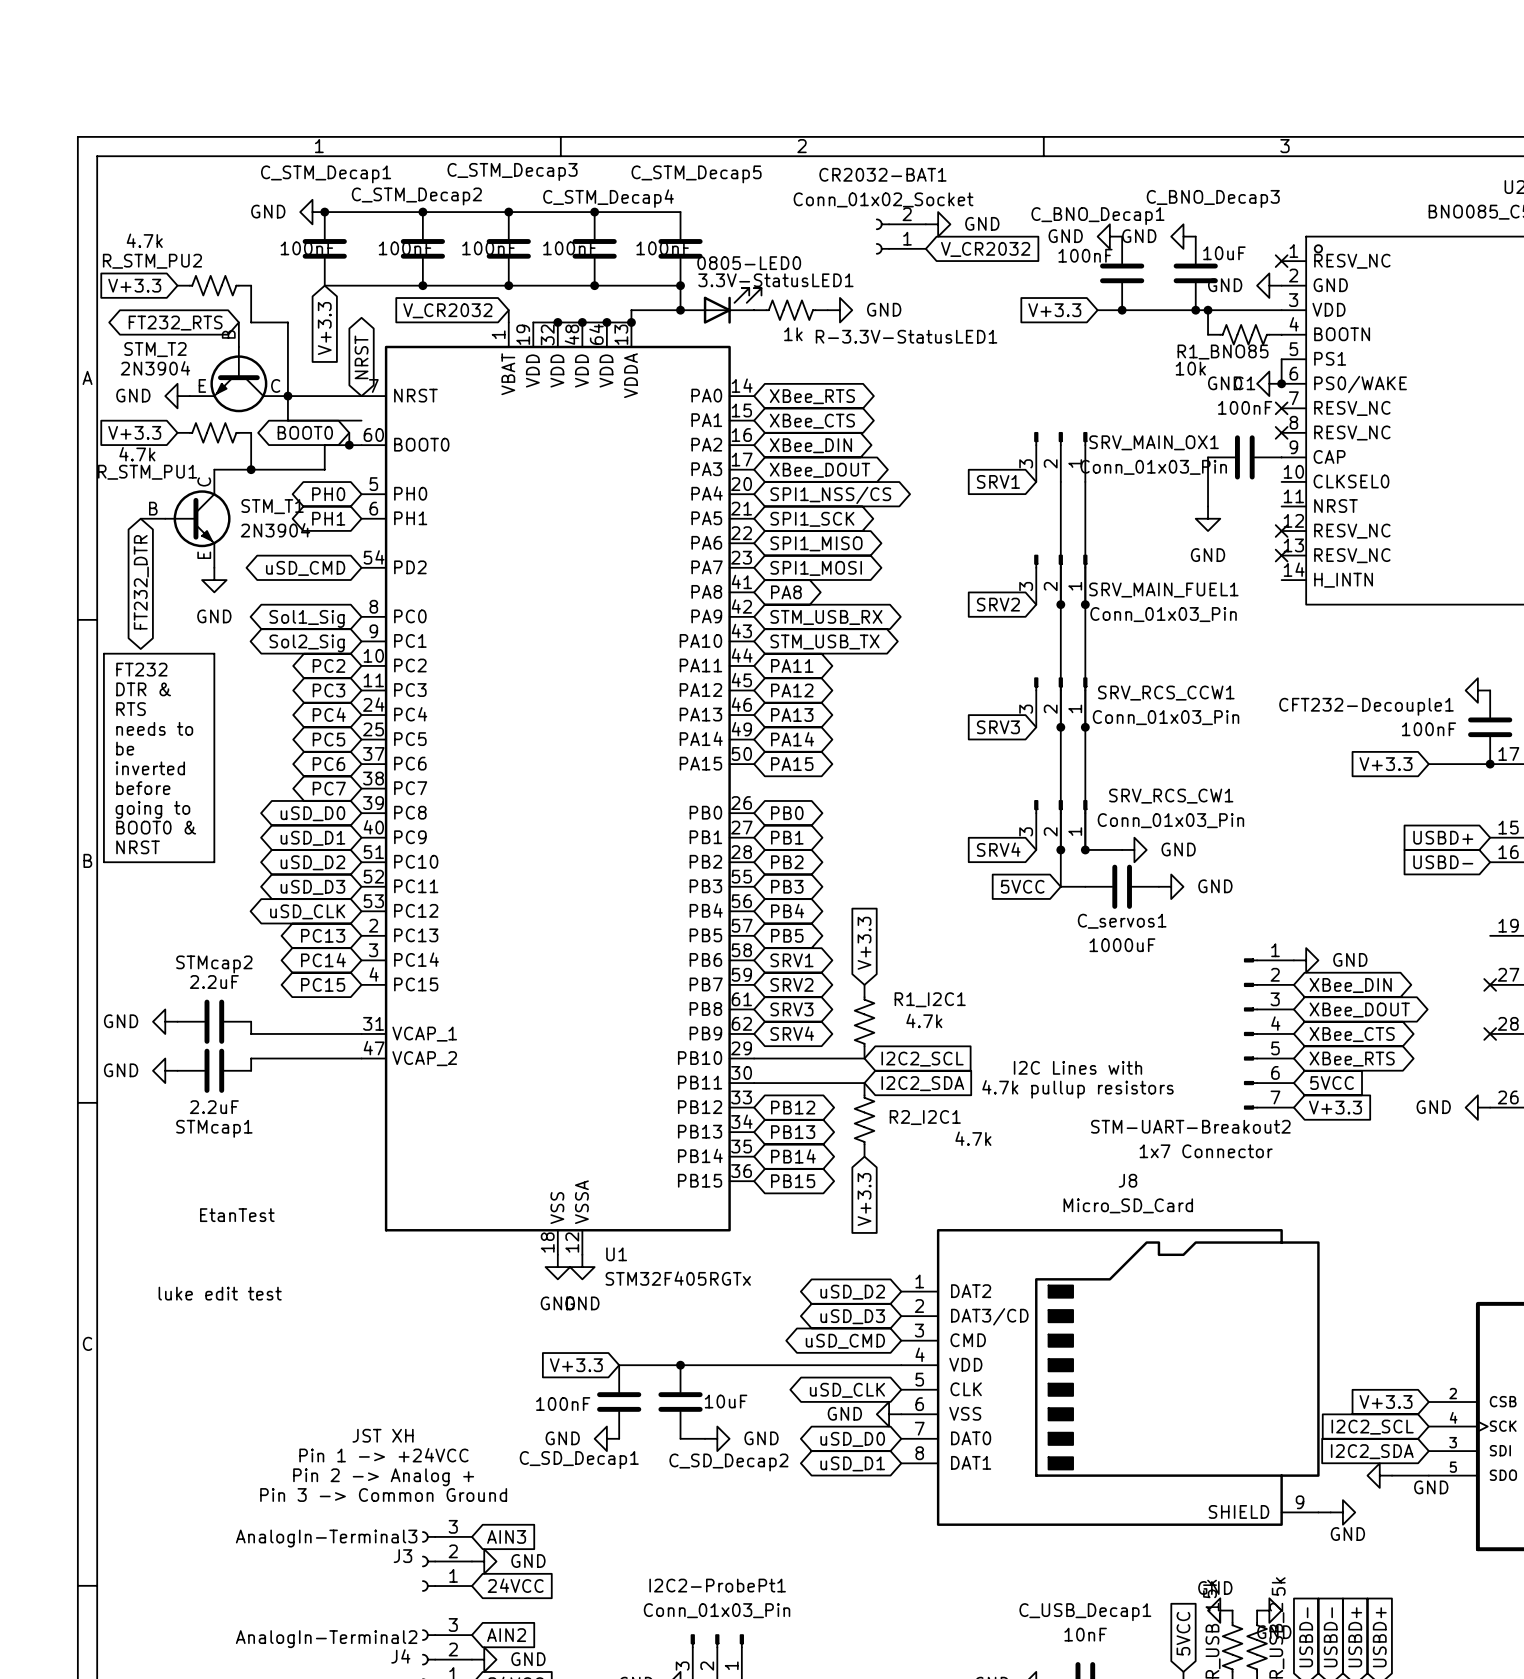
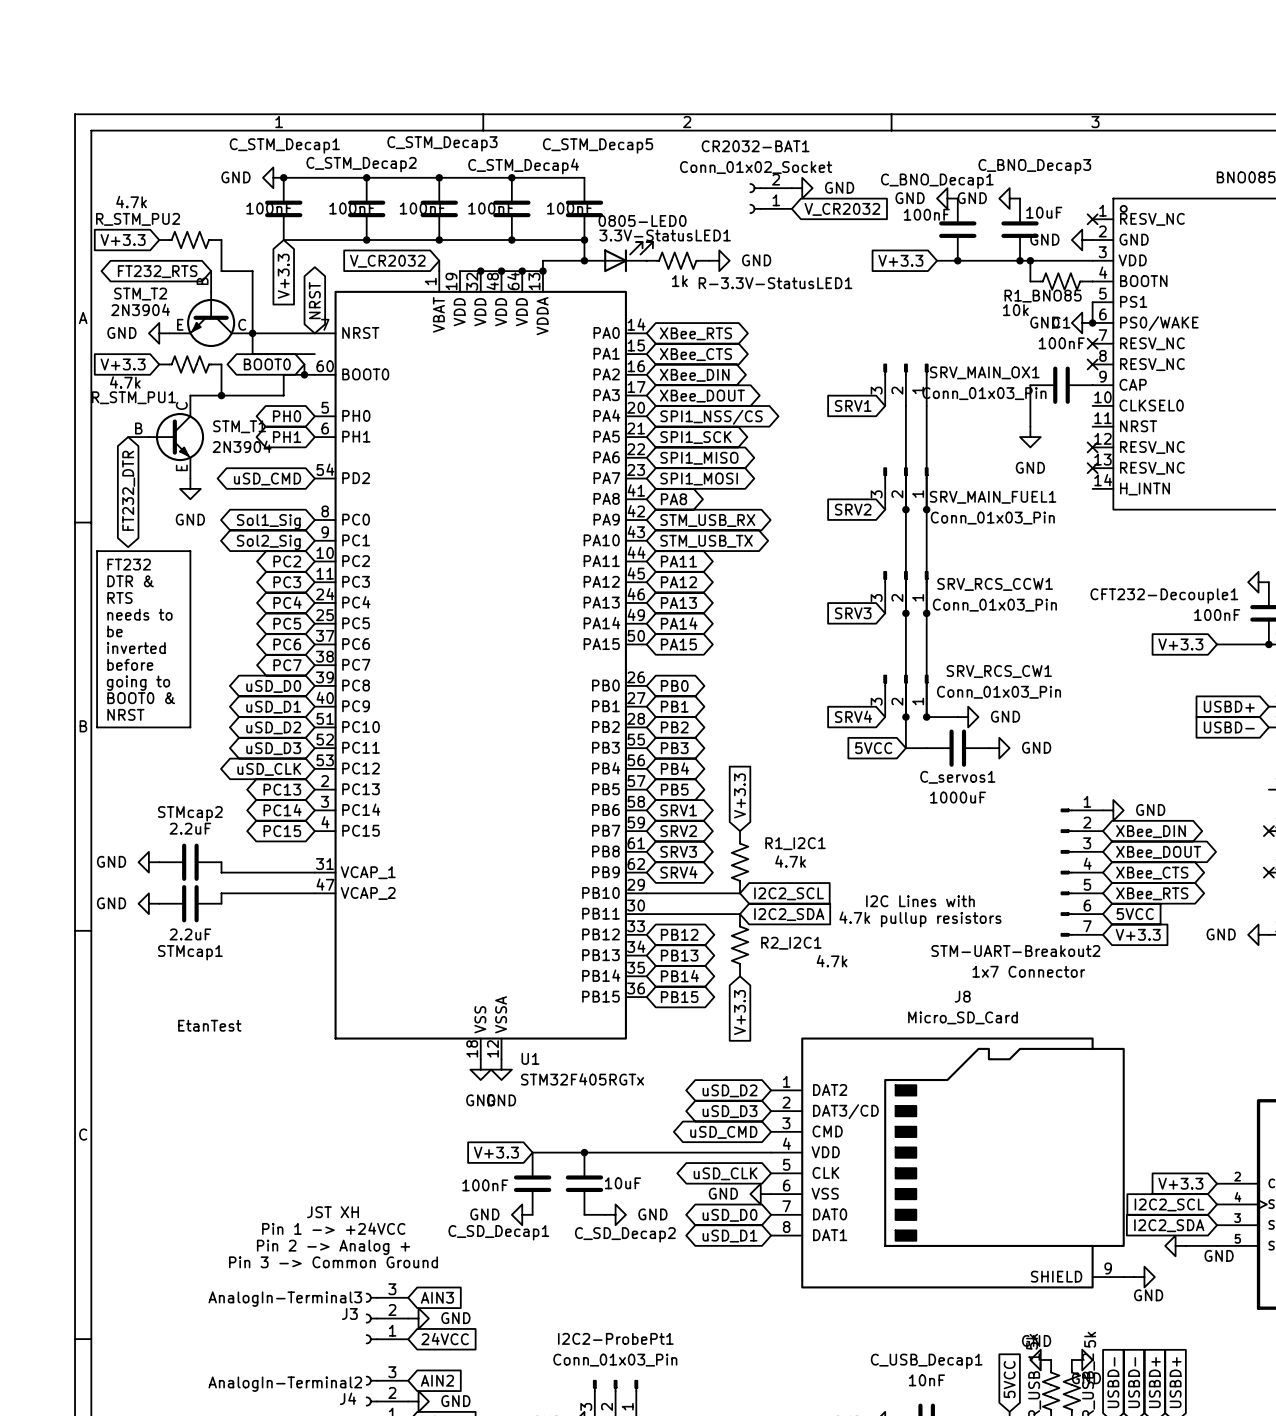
text: luke edit test (220, 1293) -> none

